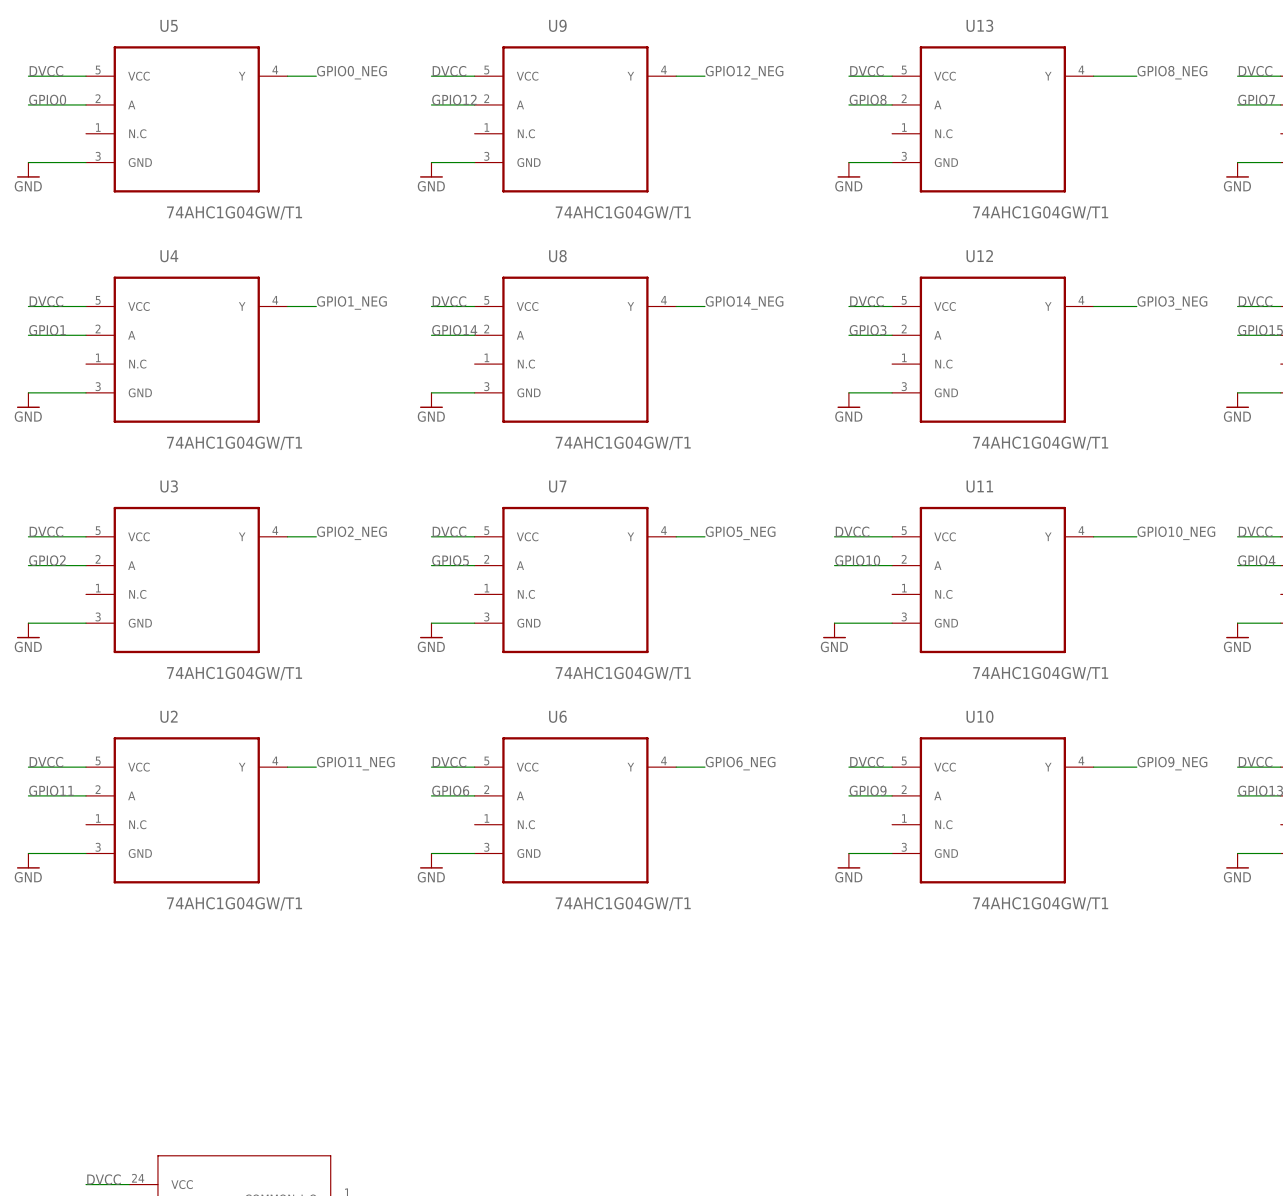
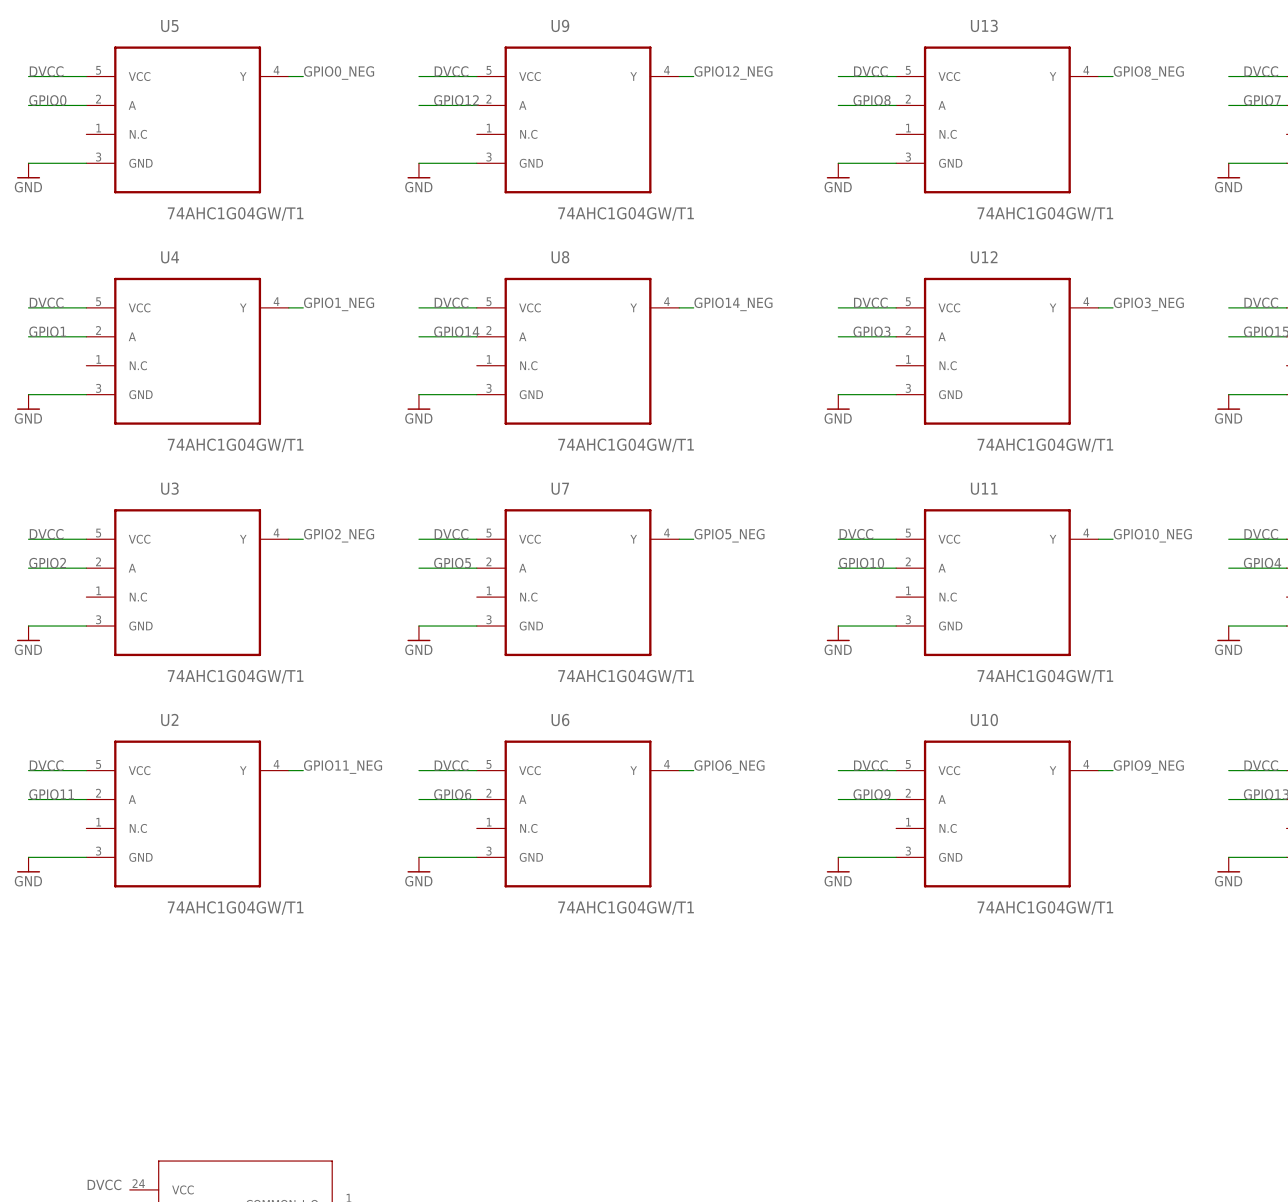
label position: GPIO0_NEG (351, 72) -> GPIO0_NEG (339, 73)
label position: GPIO12_NEG (744, 72) -> GPIO12_NEG (733, 73)
label position: GPIO8_NEG (1172, 72) -> GPIO8_NEG (1148, 73)
wire: (301, 76) (316, 76) -> (418, 76) (433, 76)
wire: (690, 76) (704, 76) -> none
wire: none -> (838, 76) (852, 76)
wire: (1108, 76) (1136, 76) -> none
wire: none -> (1228, 76) (1243, 76)
wire: none -> (418, 105) (433, 105)
wire: none -> (838, 105) (852, 105)
wire: none -> (1228, 105) (1243, 105)
wire: none -> (418, 163) (433, 163)
wire: none -> (838, 163) (852, 163)
wire: none -> (1228, 163) (1243, 163)
power symbol position: GND (431, 170) -> GND (418, 170)
power symbol position: GND (848, 170) -> GND (838, 170)
power symbol position: GND (1237, 170) -> GND (1228, 170)
label position: GPIO1_NEG (351, 303) -> GPIO1_NEG (339, 304)
label position: GPIO14_NEG (744, 303) -> GPIO14_NEG (733, 304)
label position: GPIO3_NEG (1172, 303) -> GPIO3_NEG (1148, 304)
wire: (301, 306) (316, 306) -> (418, 307) (433, 307)
wire: (690, 306) (704, 306) -> none
wire: none -> (838, 307) (852, 307)
wire: (1108, 306) (1136, 306) -> none
wire: none -> (1228, 307) (1243, 307)
wire: none -> (418, 336) (433, 336)
wire: none -> (838, 336) (852, 336)
wire: none -> (1228, 336) (1243, 336)
wire: none -> (418, 394) (433, 394)
wire: none -> (838, 394) (852, 394)
wire: none -> (1228, 394) (1243, 394)
power symbol position: GND (431, 400) -> GND (418, 402)
power symbol position: GND (848, 400) -> GND (838, 402)
power symbol position: GND (1237, 400) -> GND (1228, 402)
label position: GPIO2_NEG (351, 533) -> GPIO2_NEG (339, 535)
label position: GPIO5_NEG (740, 533) -> GPIO5_NEG (729, 535)
label position: GPIO10_NEG (1176, 533) -> GPIO10_NEG (1152, 535)
wire: (301, 536) (316, 536) -> (418, 539) (433, 539)
wire: (690, 536) (704, 536) -> none
wire: (1108, 536) (1136, 536) -> none
wire: none -> (1228, 539) (1243, 539)
wire: none -> (418, 568) (433, 568)
wire: none -> (1228, 568) (1243, 568)
wire: none -> (418, 626) (433, 626)
wire: none -> (1228, 626) (1243, 626)
power symbol position: GND (431, 630) -> GND (418, 633)
power symbol position: GND (1237, 630) -> GND (1228, 633)
label position: GPIO11_NEG (355, 763) -> GPIO11_NEG (343, 767)
label position: GPIO6_NEG (740, 763) -> GPIO6_NEG (729, 767)
label position: GPIO9_NEG (1172, 763) -> GPIO9_NEG (1148, 767)
wire: (301, 767) (316, 767) -> (418, 770) (433, 770)
wire: (690, 767) (704, 767) -> none
wire: none -> (838, 770) (852, 770)
wire: (1108, 767) (1136, 767) -> none
wire: none -> (1228, 770) (1243, 770)
wire: none -> (418, 799) (433, 799)
wire: none -> (838, 799) (852, 799)
wire: none -> (1228, 799) (1243, 799)
wire: none -> (418, 857) (433, 857)
wire: none -> (838, 857) (852, 857)
wire: none -> (1228, 857) (1243, 857)
power symbol position: GND (431, 861) -> GND (418, 864)
power symbol position: GND (848, 861) -> GND (838, 864)
power symbol position: GND (1237, 861) -> GND (1228, 864)
wire: (86, 1184) (129, 1184) -> none

